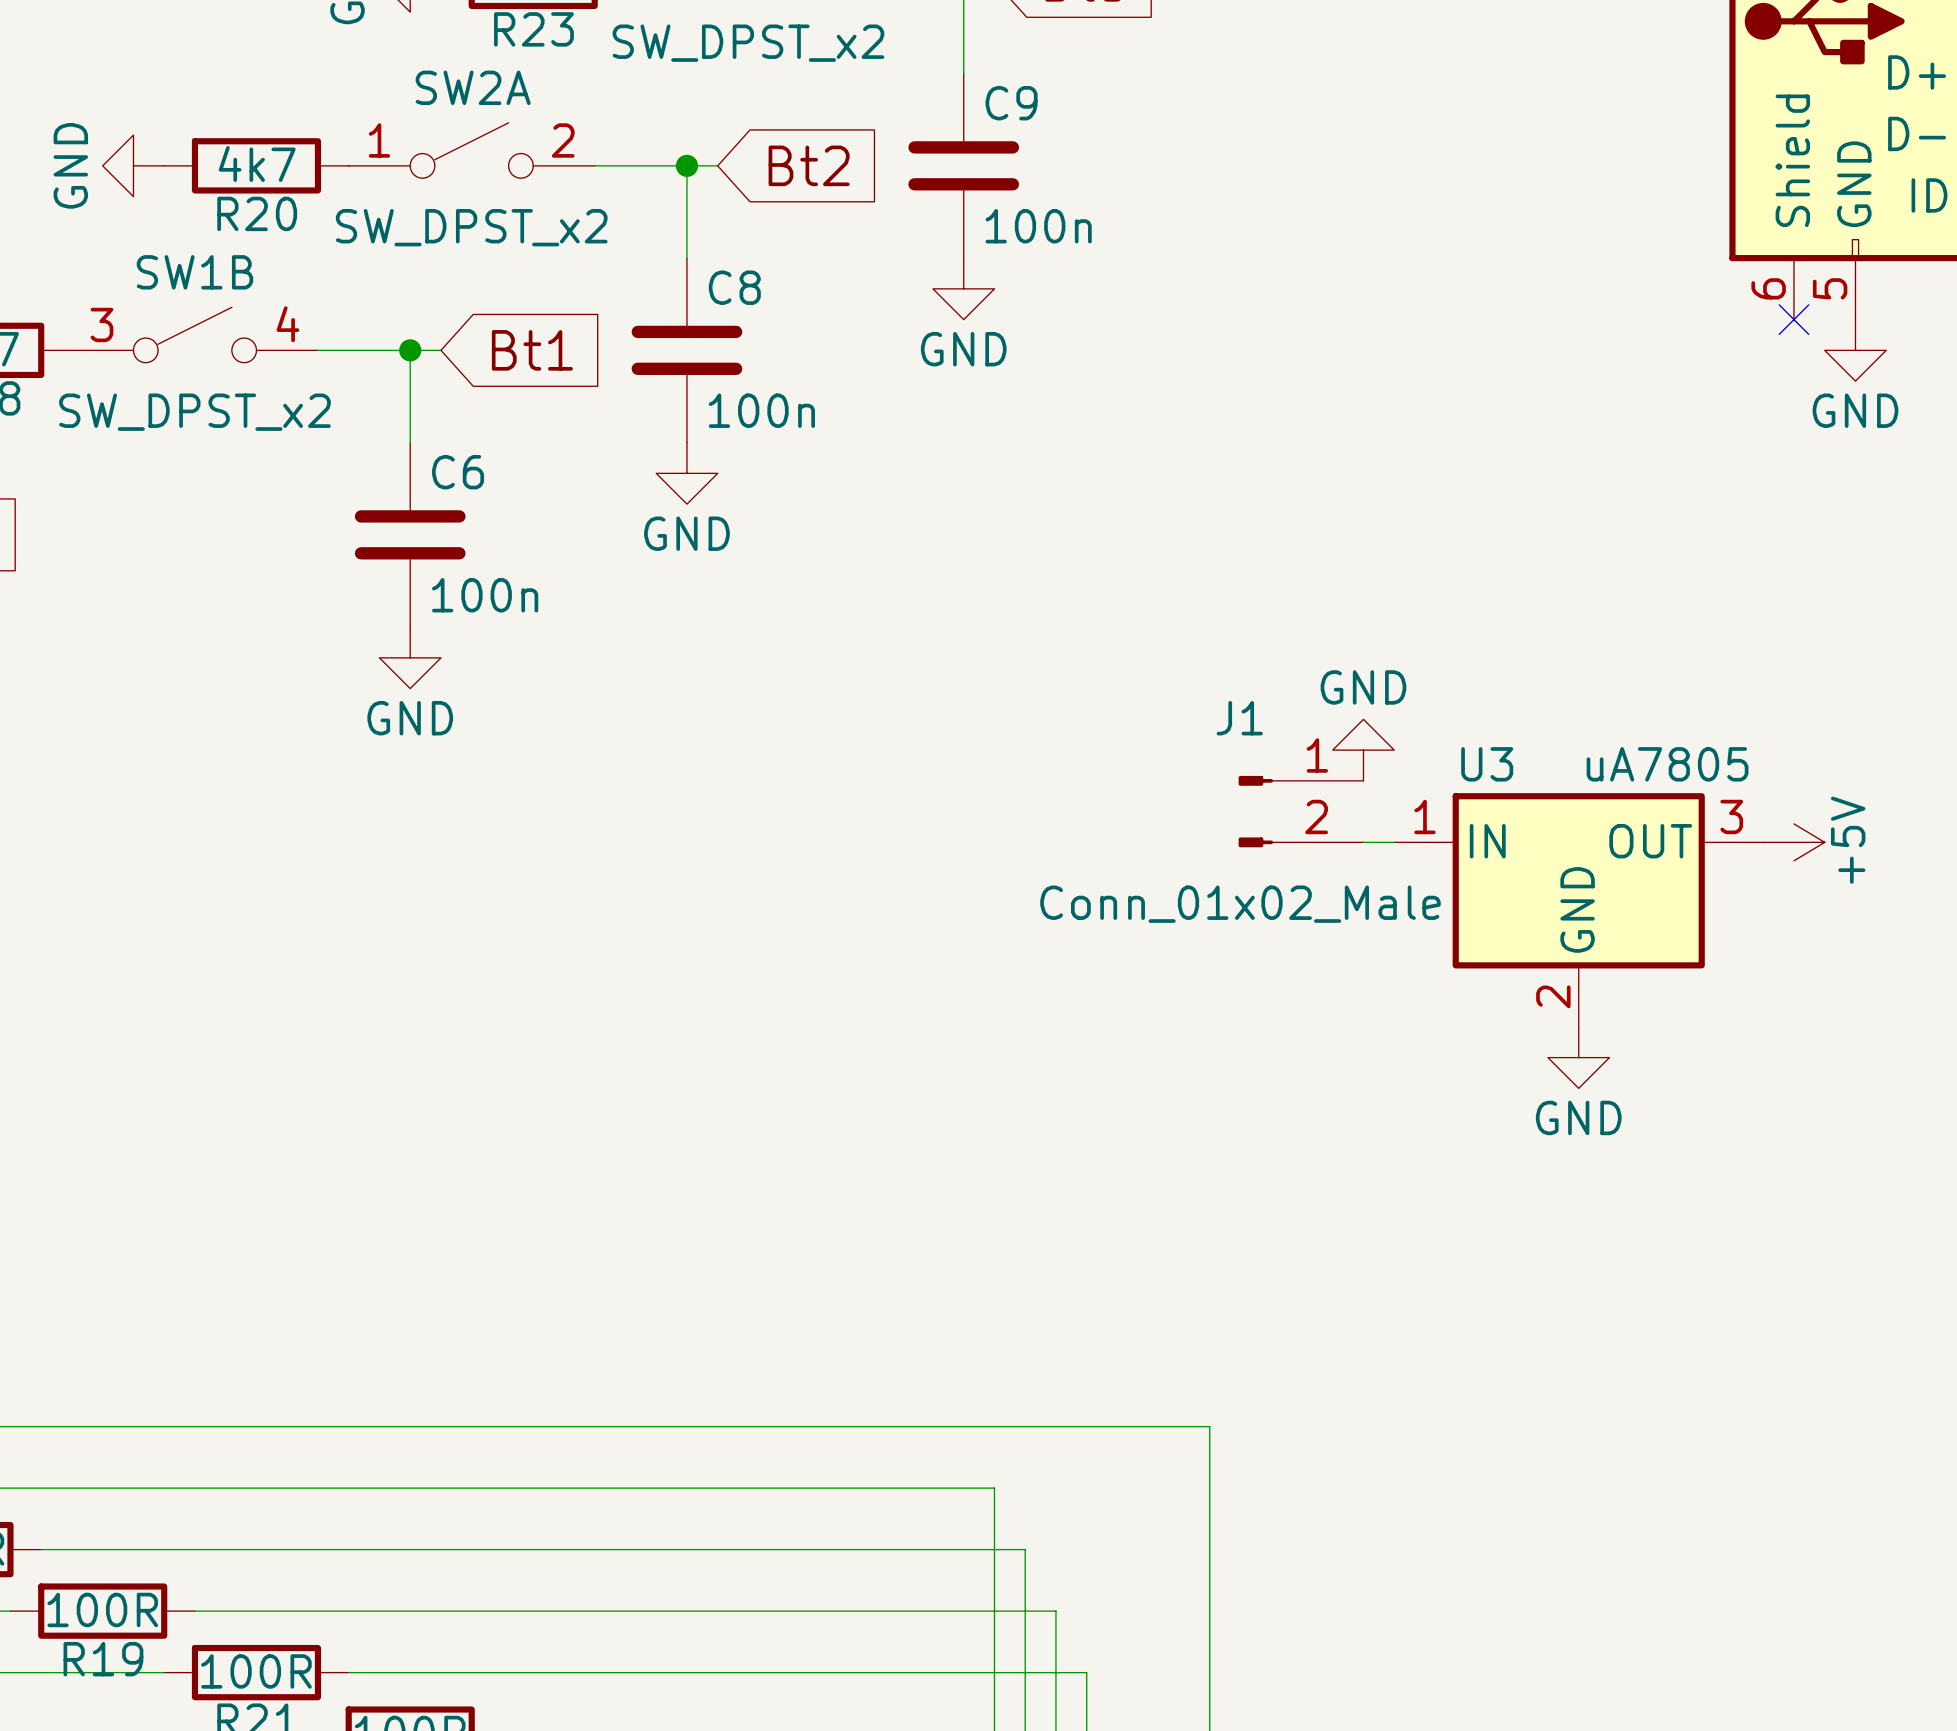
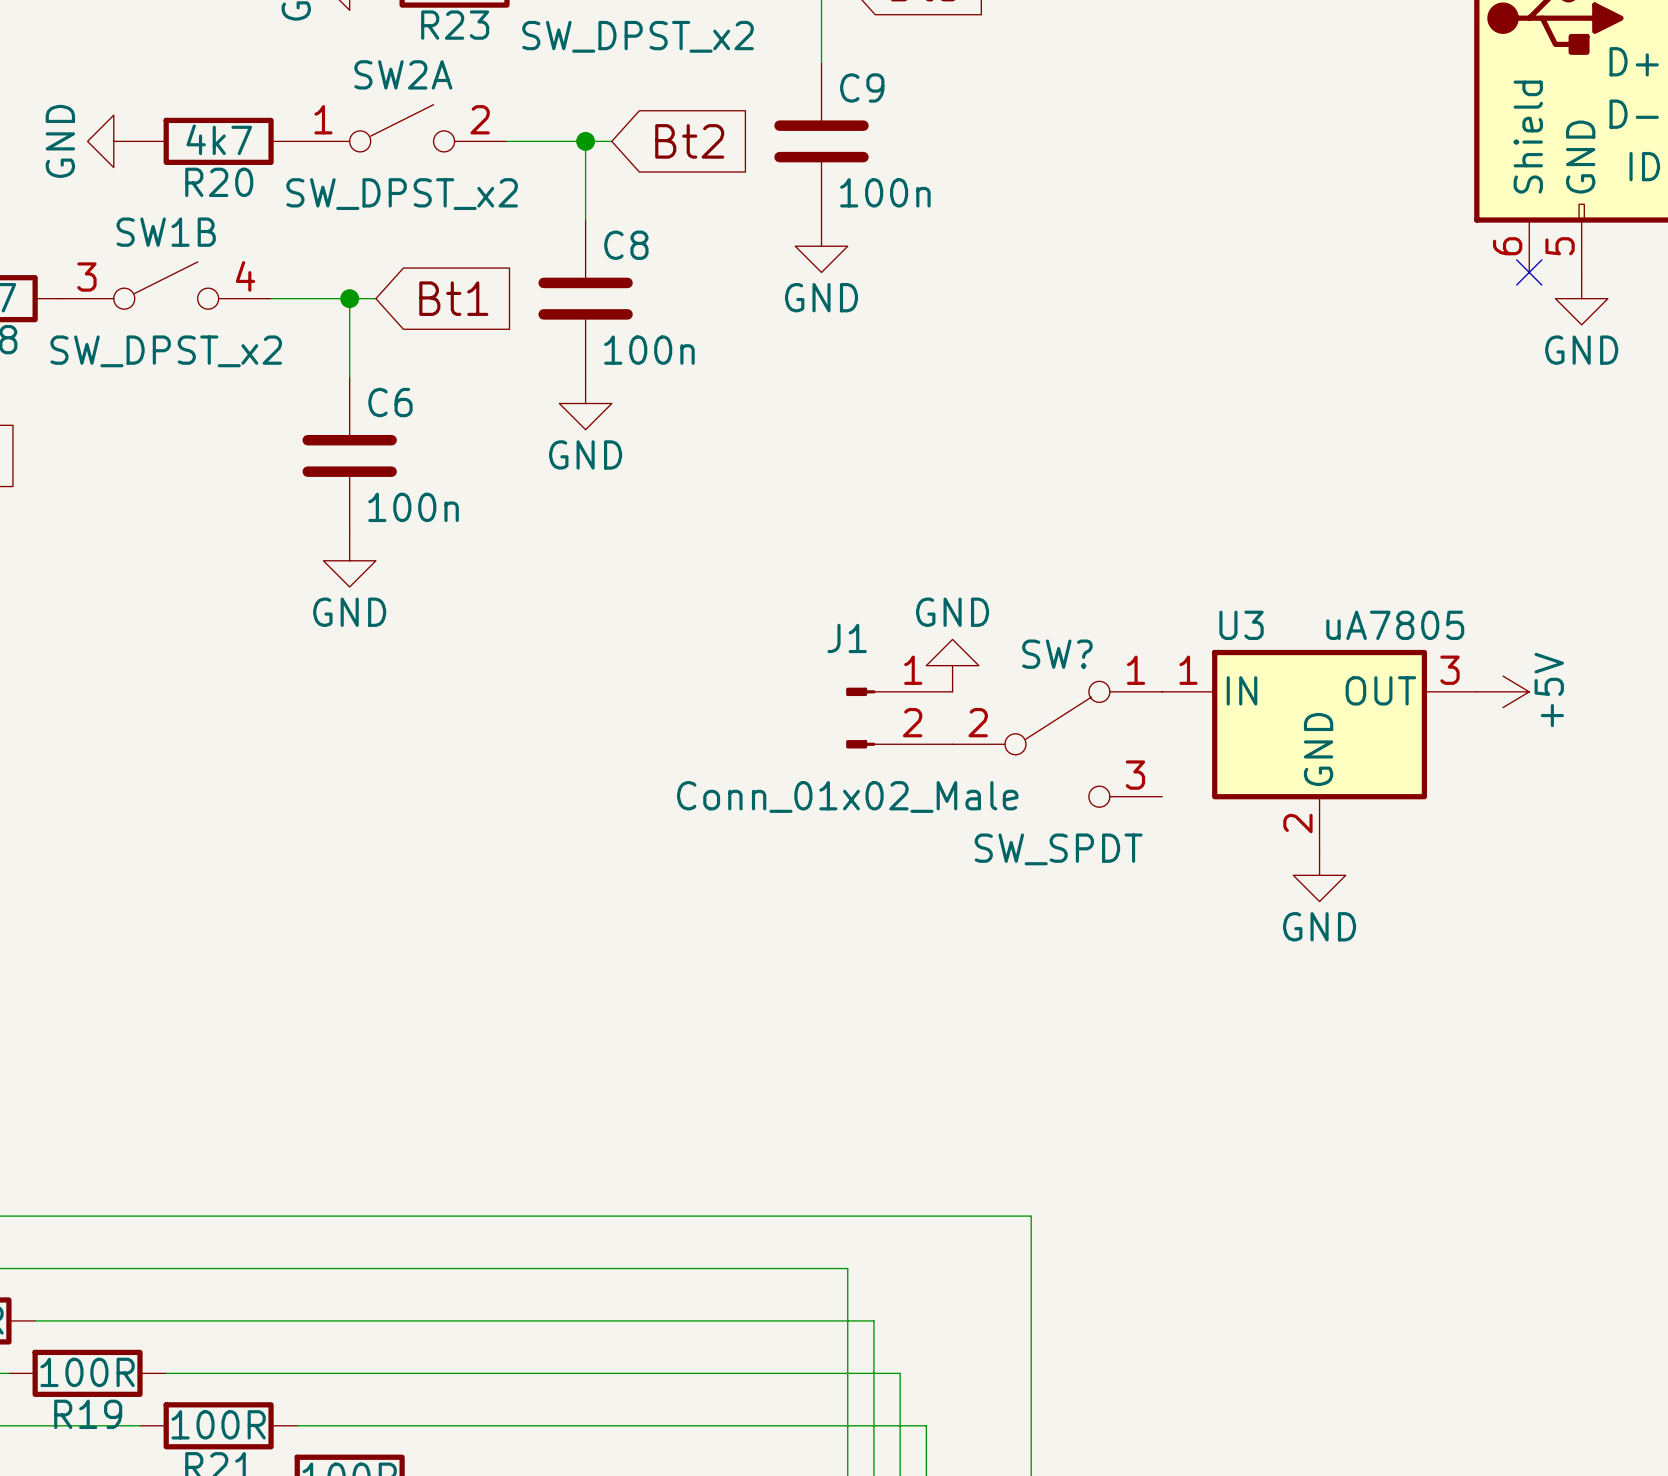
power symbol: GND (1363, 750) -> none
power symbol: none -> GND (952, 665)
J1 position: (1301, 811) -> (899, 718)
wire: (1363, 842) (1394, 842) -> none
power symbol position: +5V (1793, 842) -> +5V (1503, 691)
SW?: none -> SW_SPDT (1057, 744)
U3 position: (1578, 910) -> (1319, 749)
power symbol position: GND (1578, 1057) -> GND (1319, 875)

